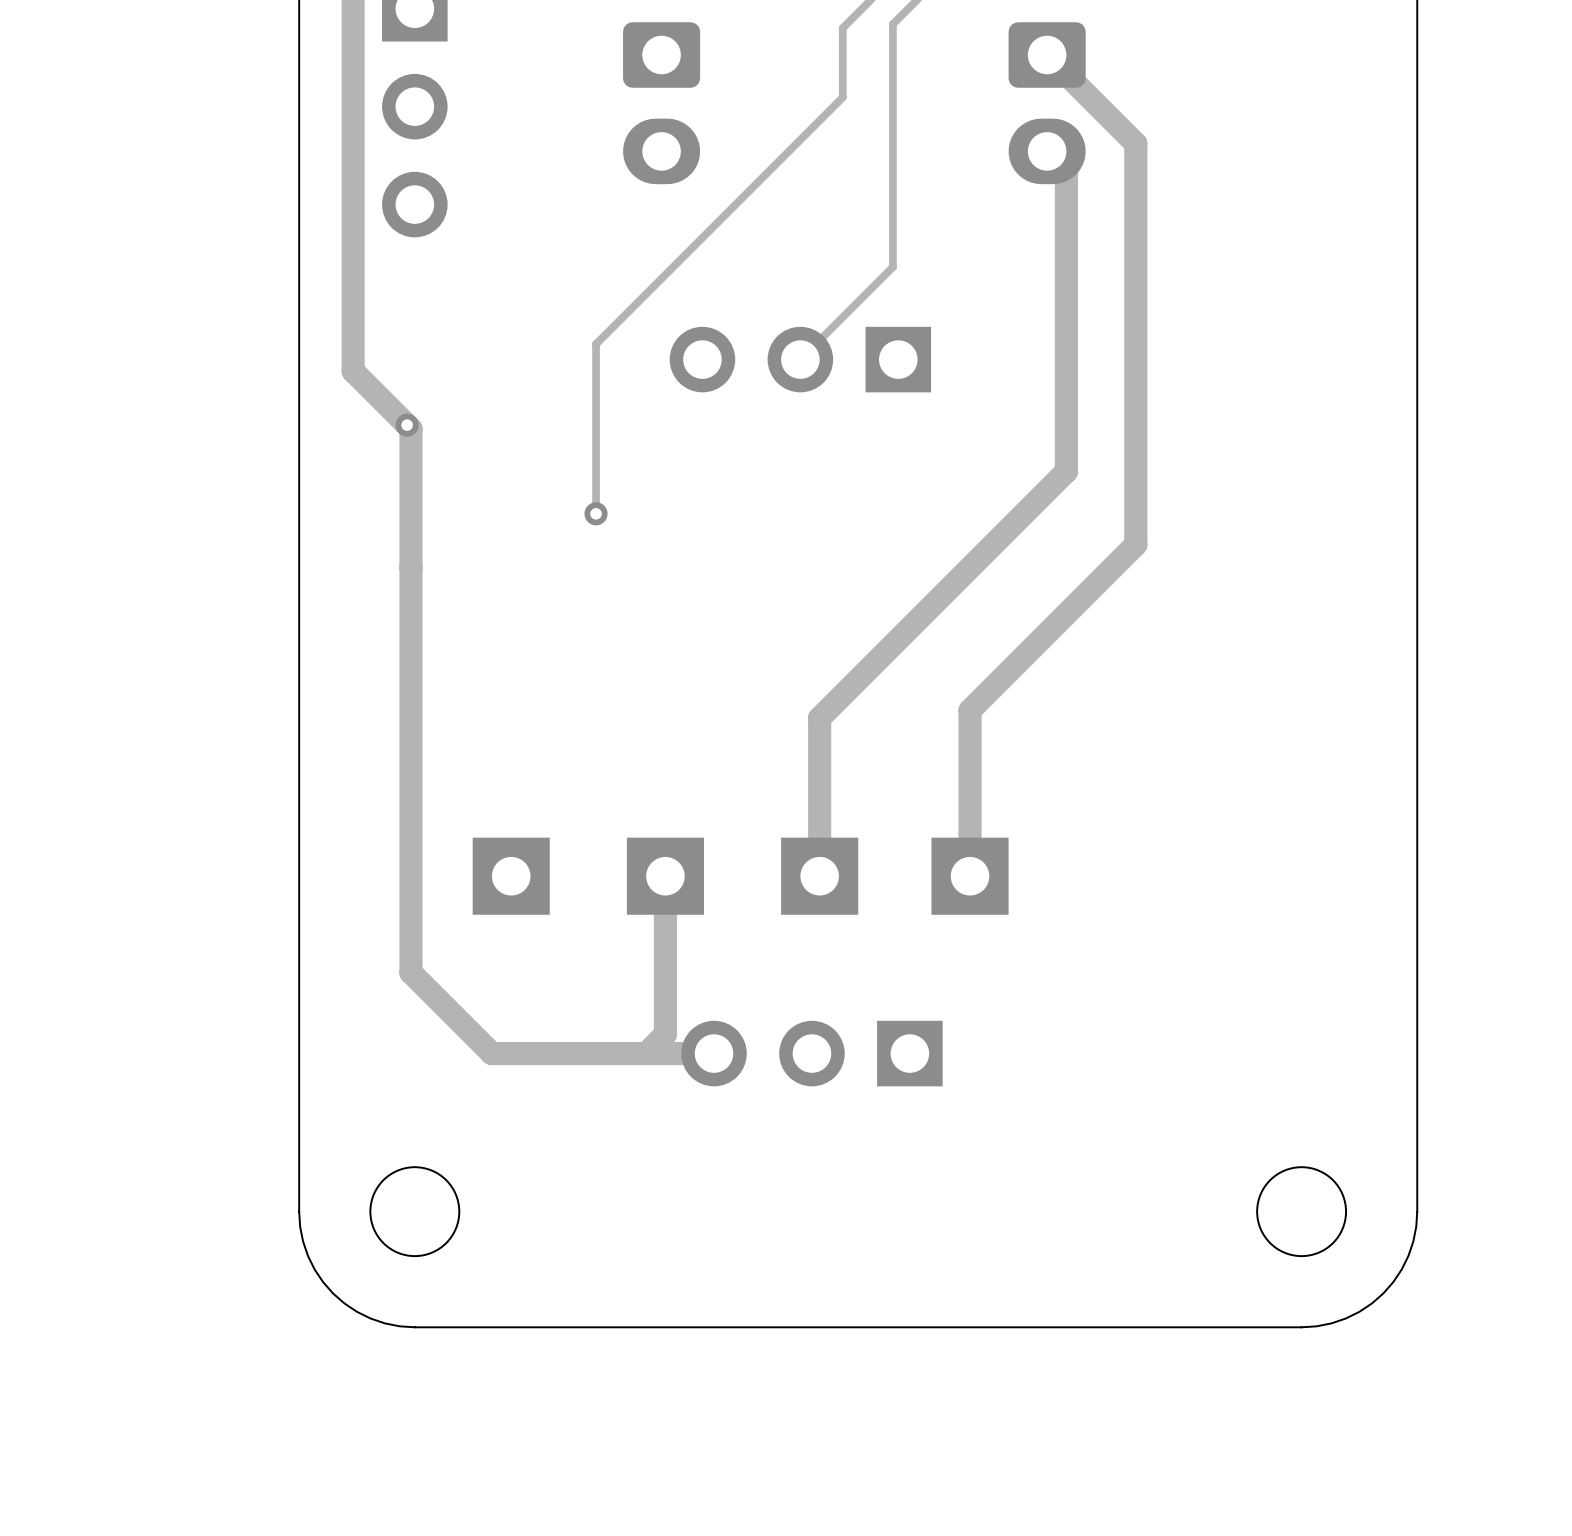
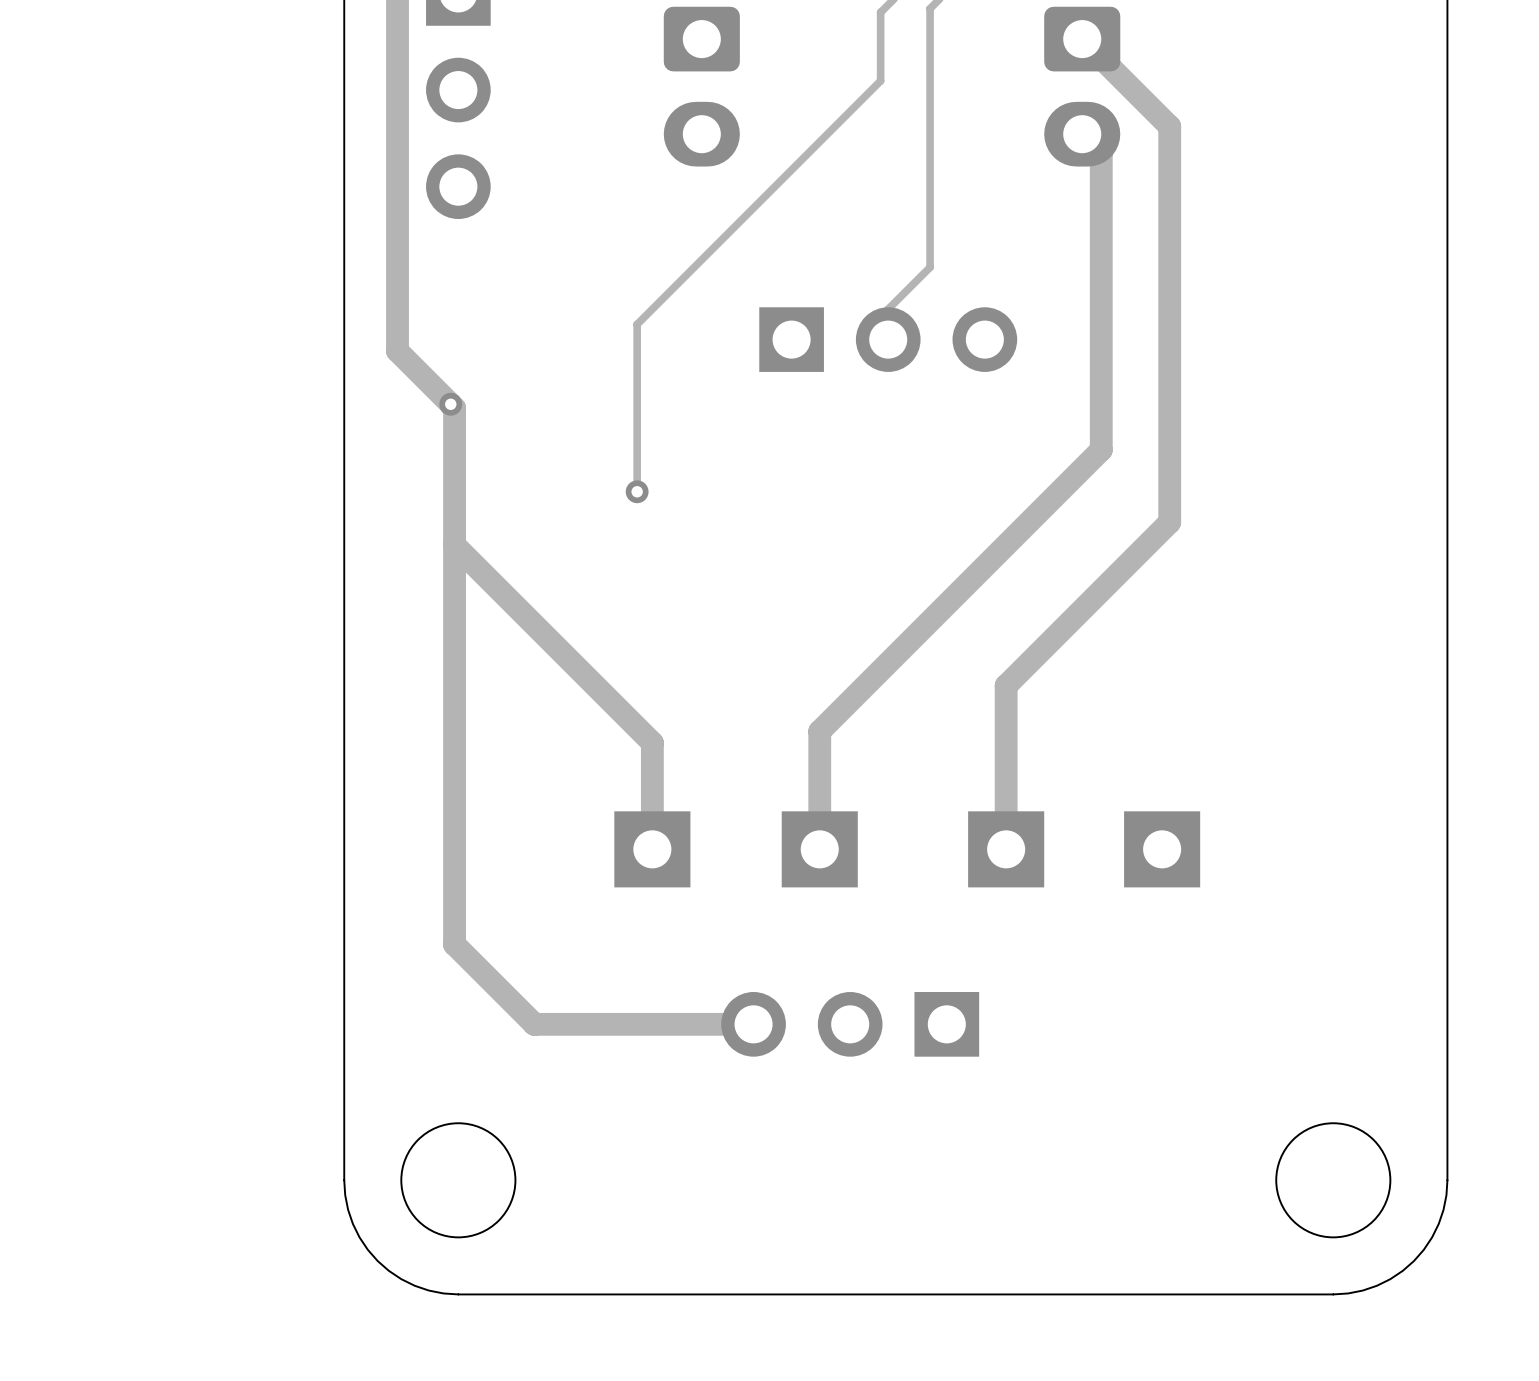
track: (892, 267) (810, 349) (821, 359) -> (930, 248) (930, 267) (888, 309) (888, 339)
part rotation: 0° (800, 359) -> 180° (888, 339)
track: none -> (454, 545) (652, 742) (652, 849)
track: (819, 718) (819, 876) -> (857, 693) (819, 731) (819, 849)
part: (511, 876) -> none
part: none -> (652, 849)
track: (665, 876) (665, 1034) (646, 1053) -> none
part: (665, 876) -> none
part position: (819, 876) -> (819, 849)
part: none -> (1162, 849)
round board edge size: [369, 1166, 461, 1258] -> [400, 1122, 517, 1239]
round board edge size: [1256, 1166, 1348, 1258] -> [1275, 1122, 1392, 1239]

